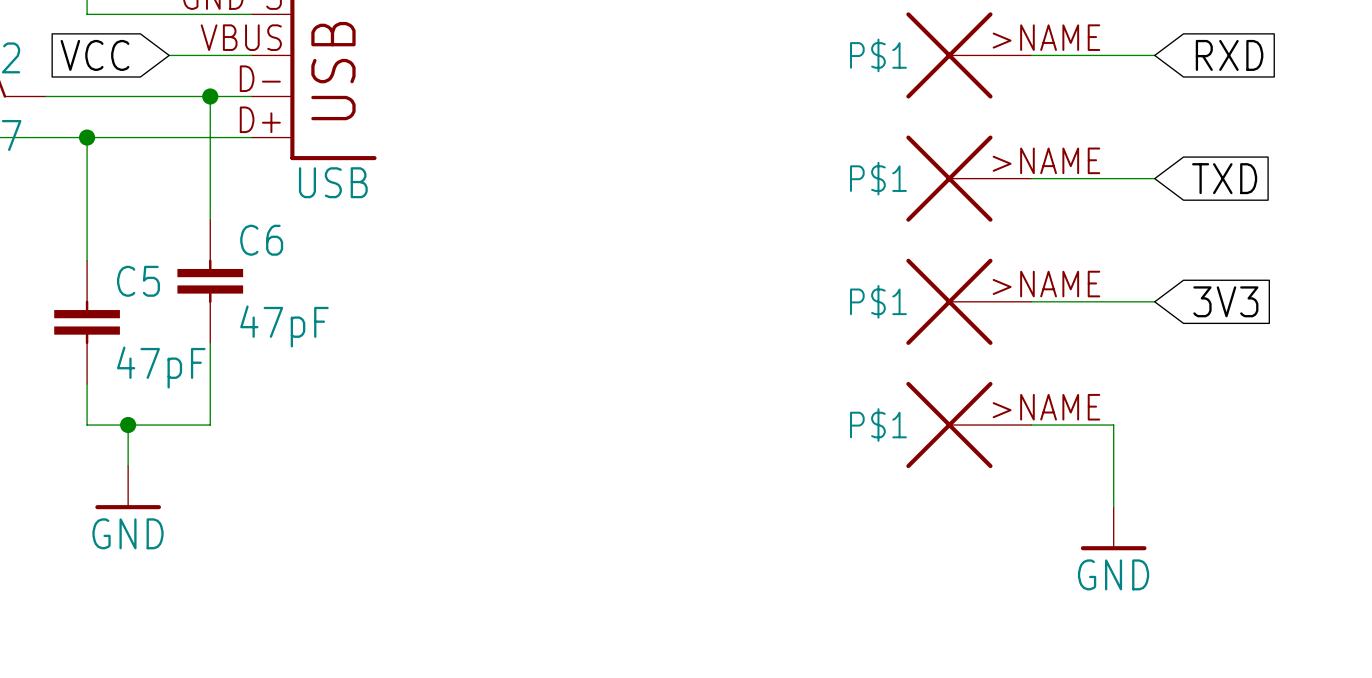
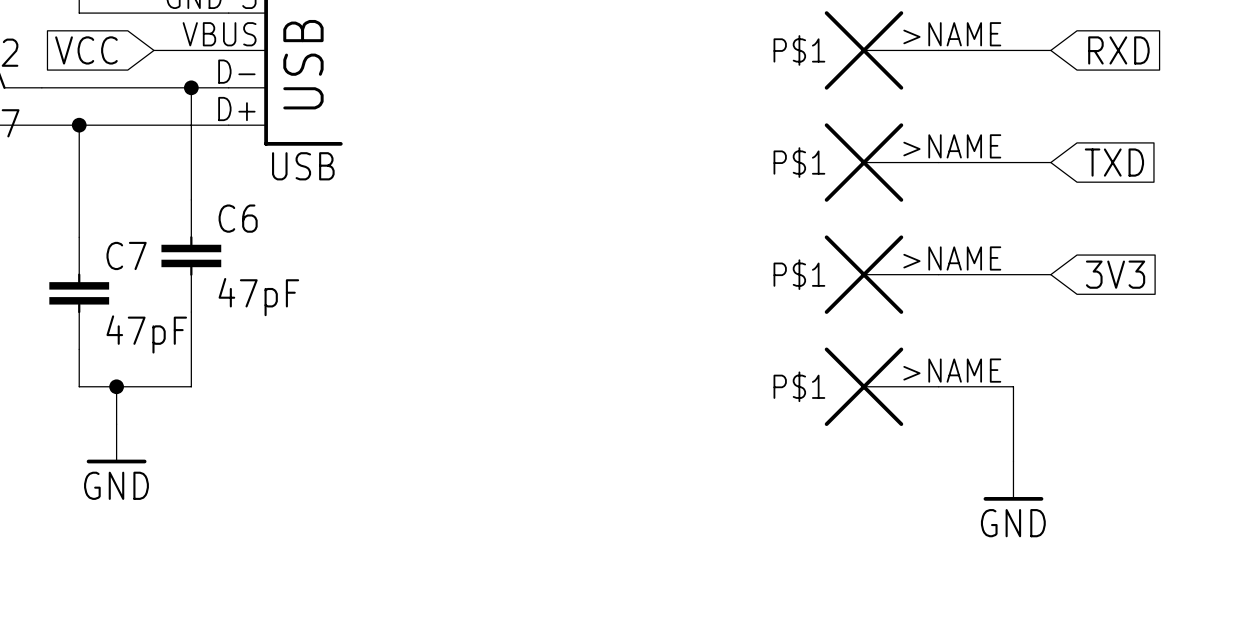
C5 name: C5 (138, 281) -> C7 (126, 255)

